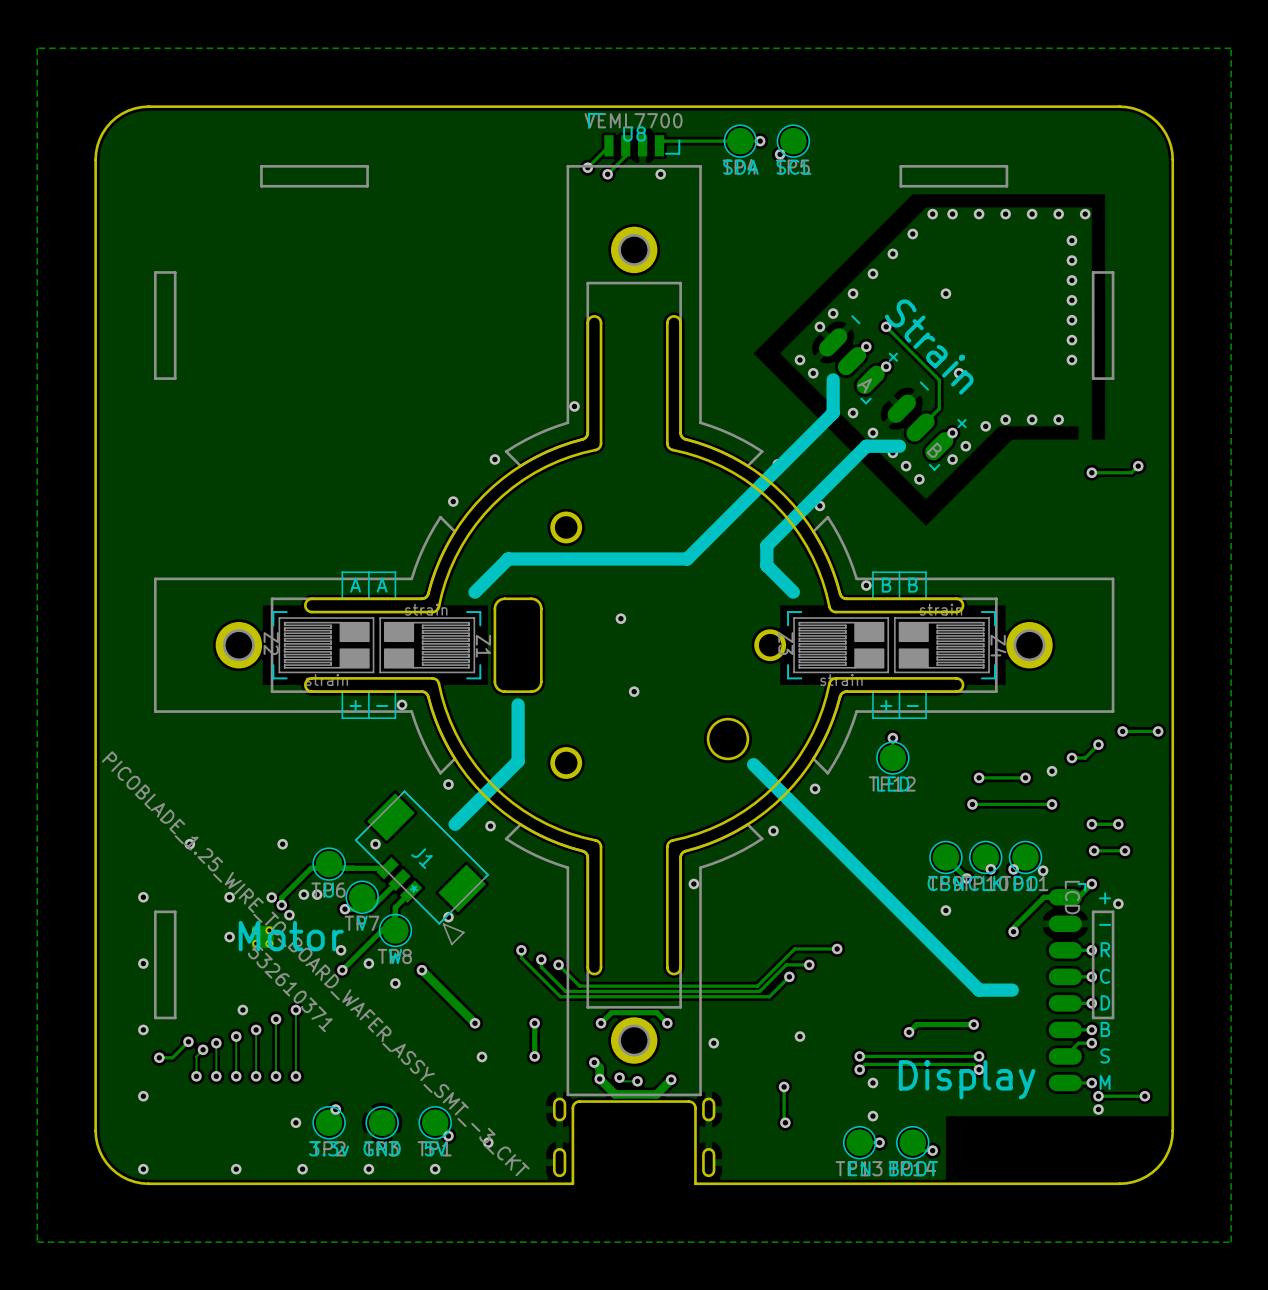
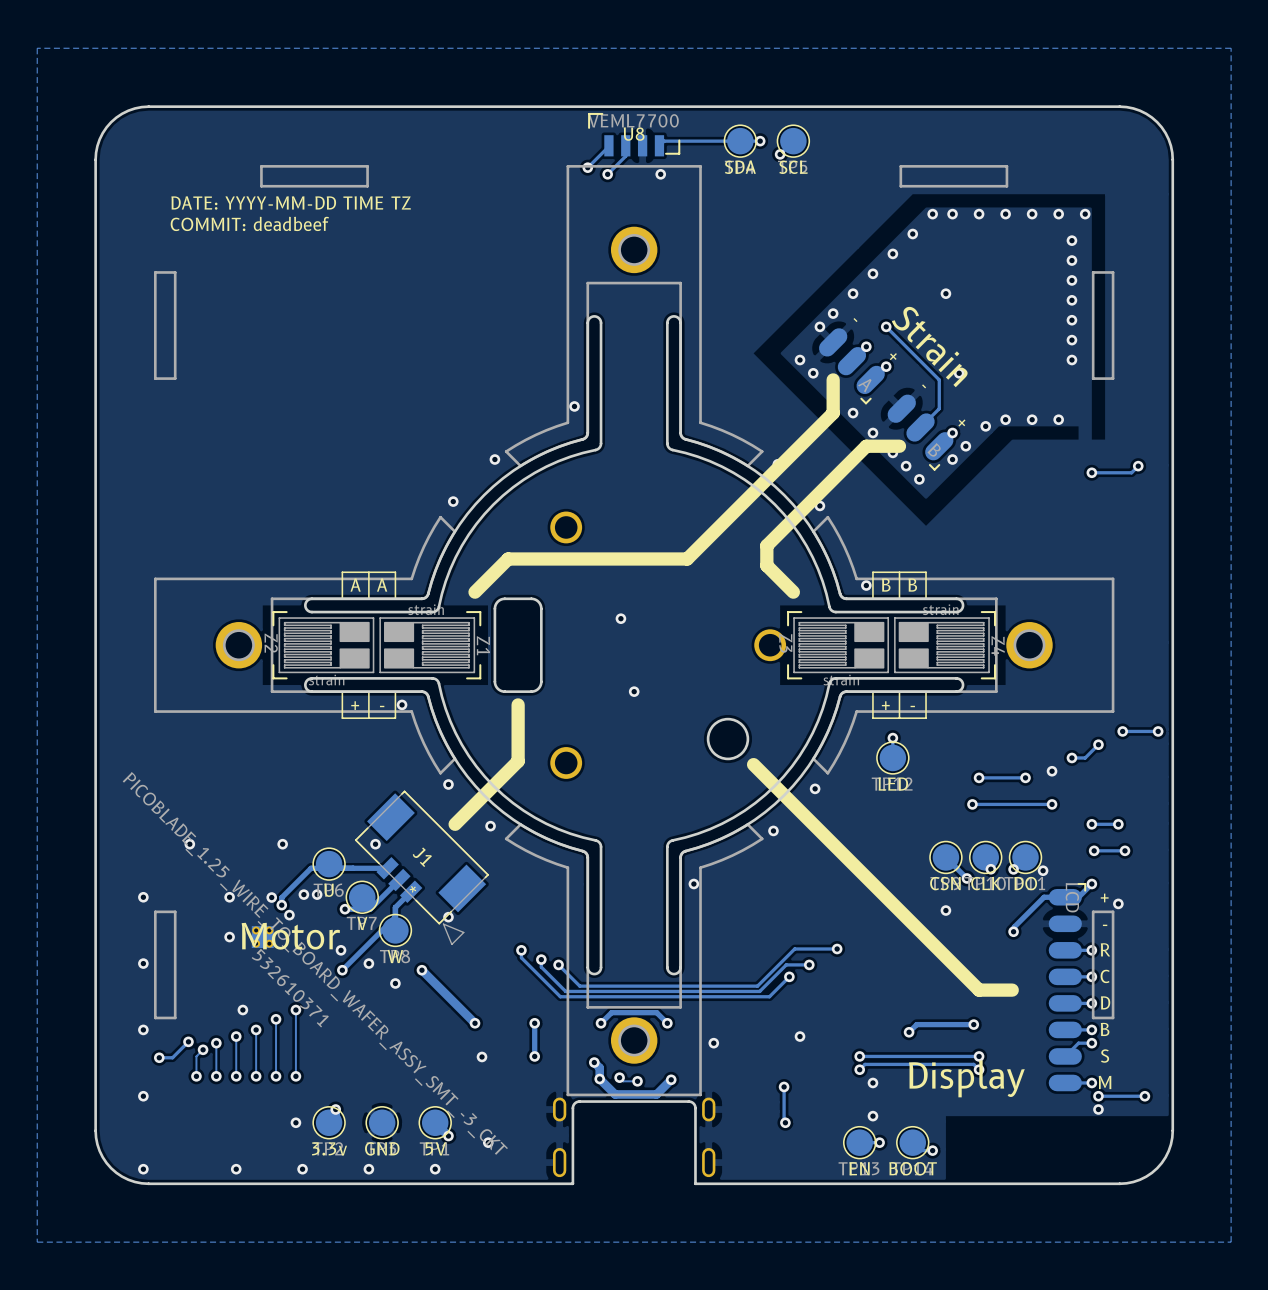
text: none -> DATE: YYYY-MM-DD TIME TZ (291, 203)
text: none -> COMMIT: deadbeef (249, 223)

